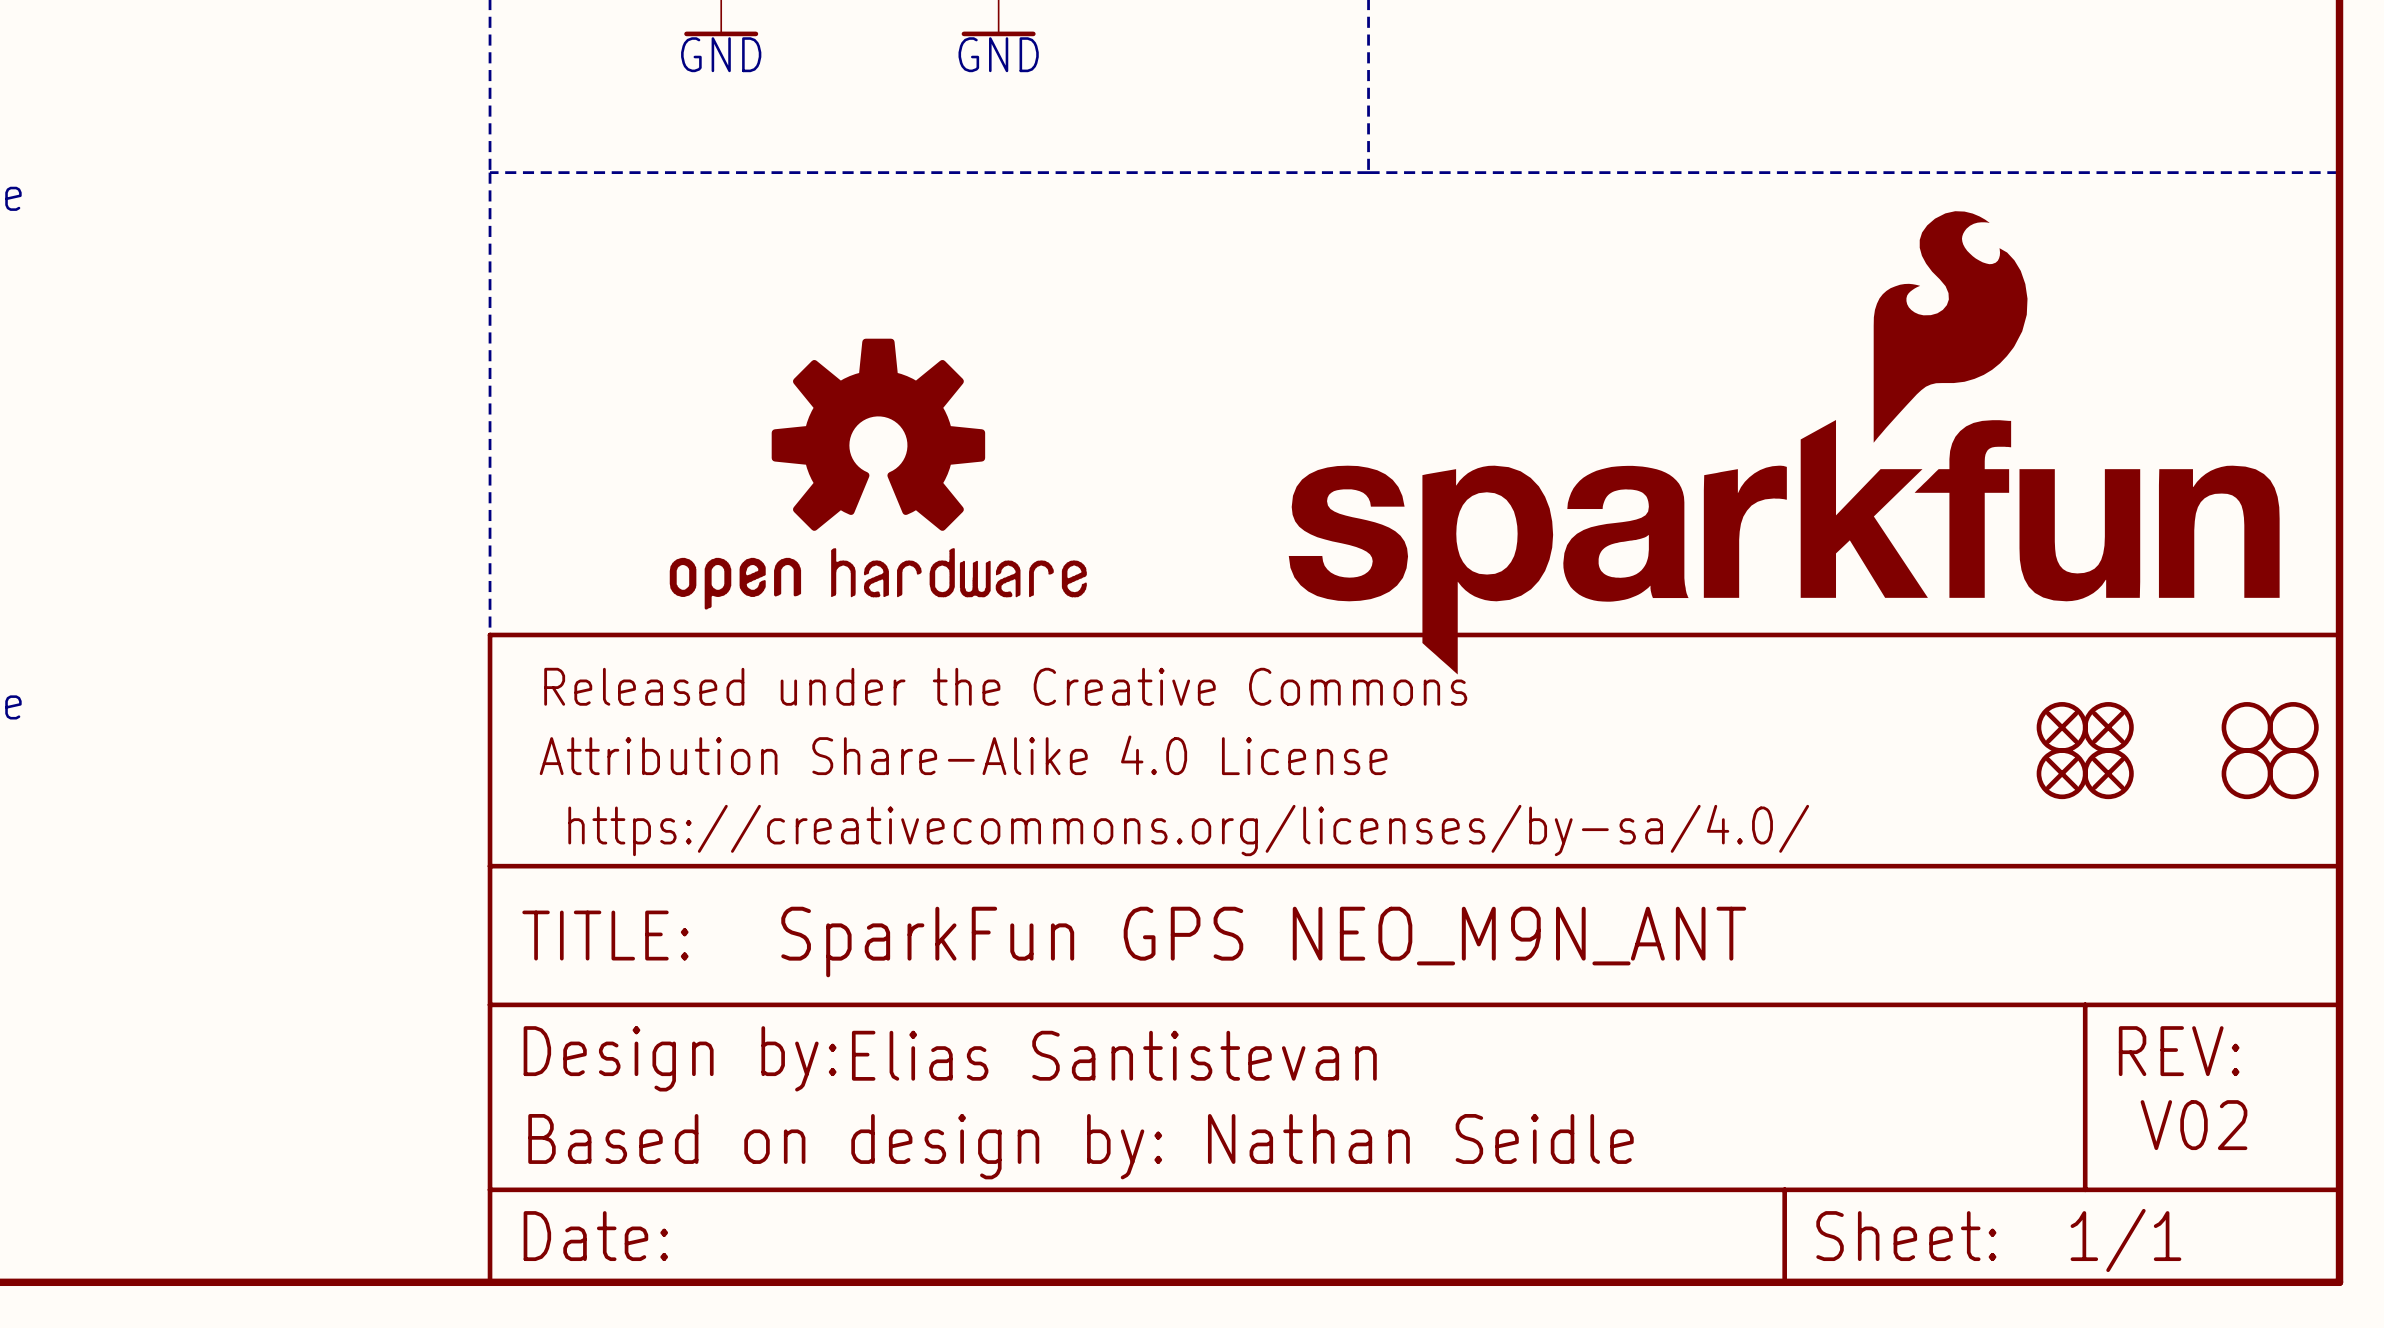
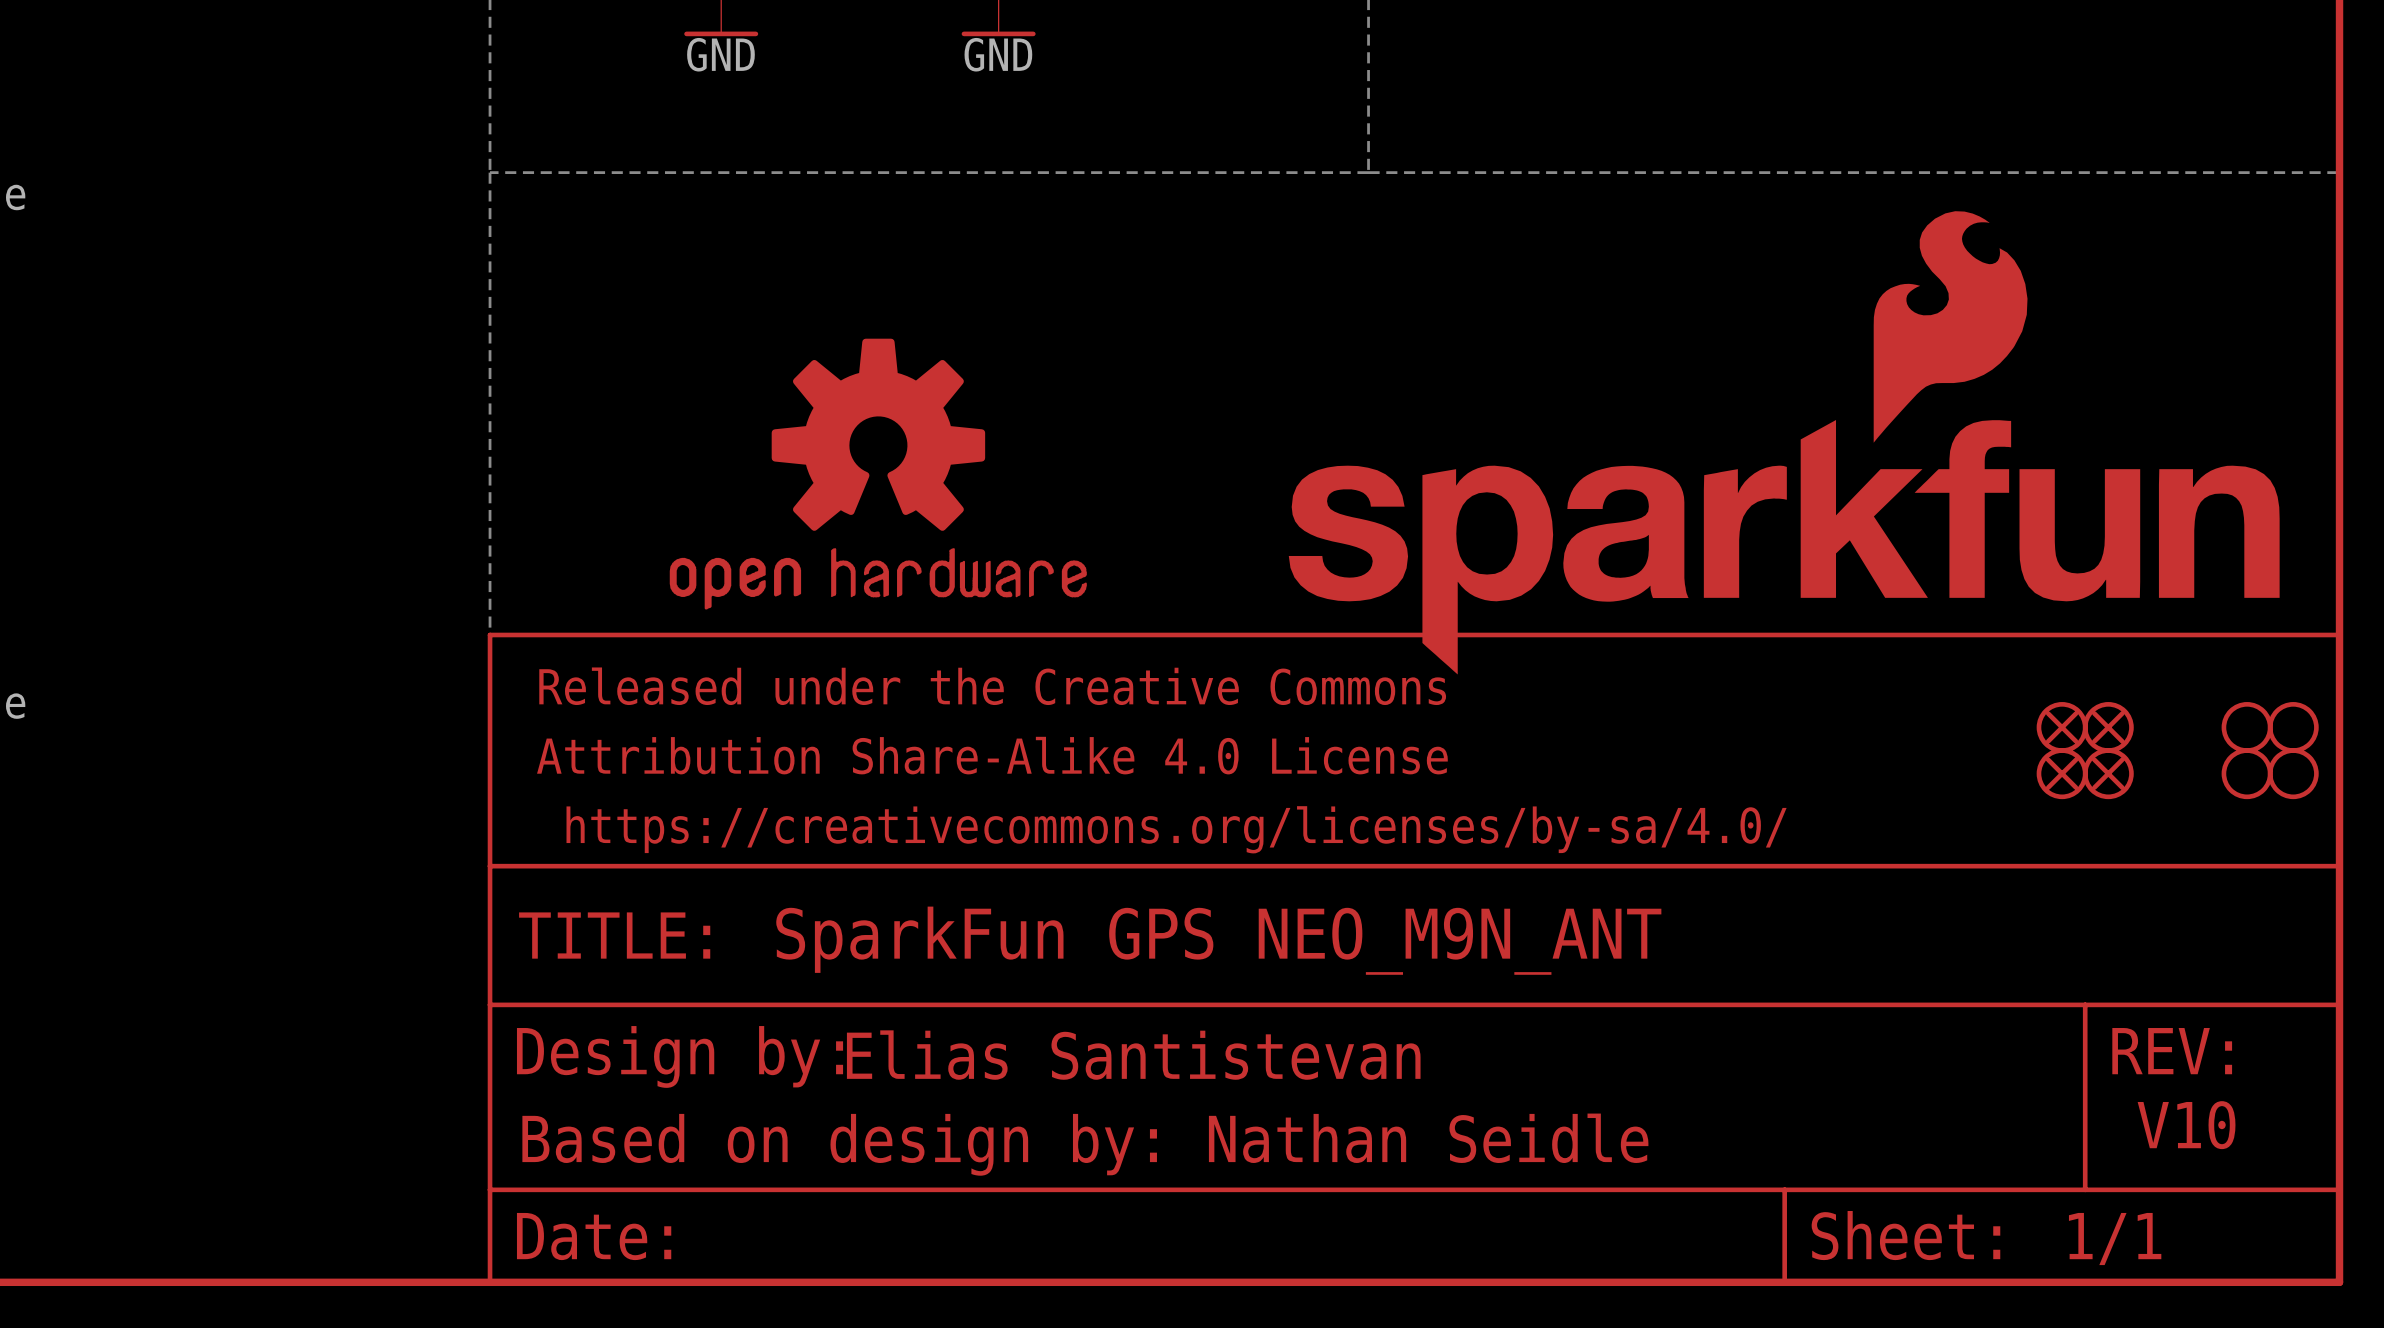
text: V02 (2193, 1125) -> V10 (2186, 1125)

